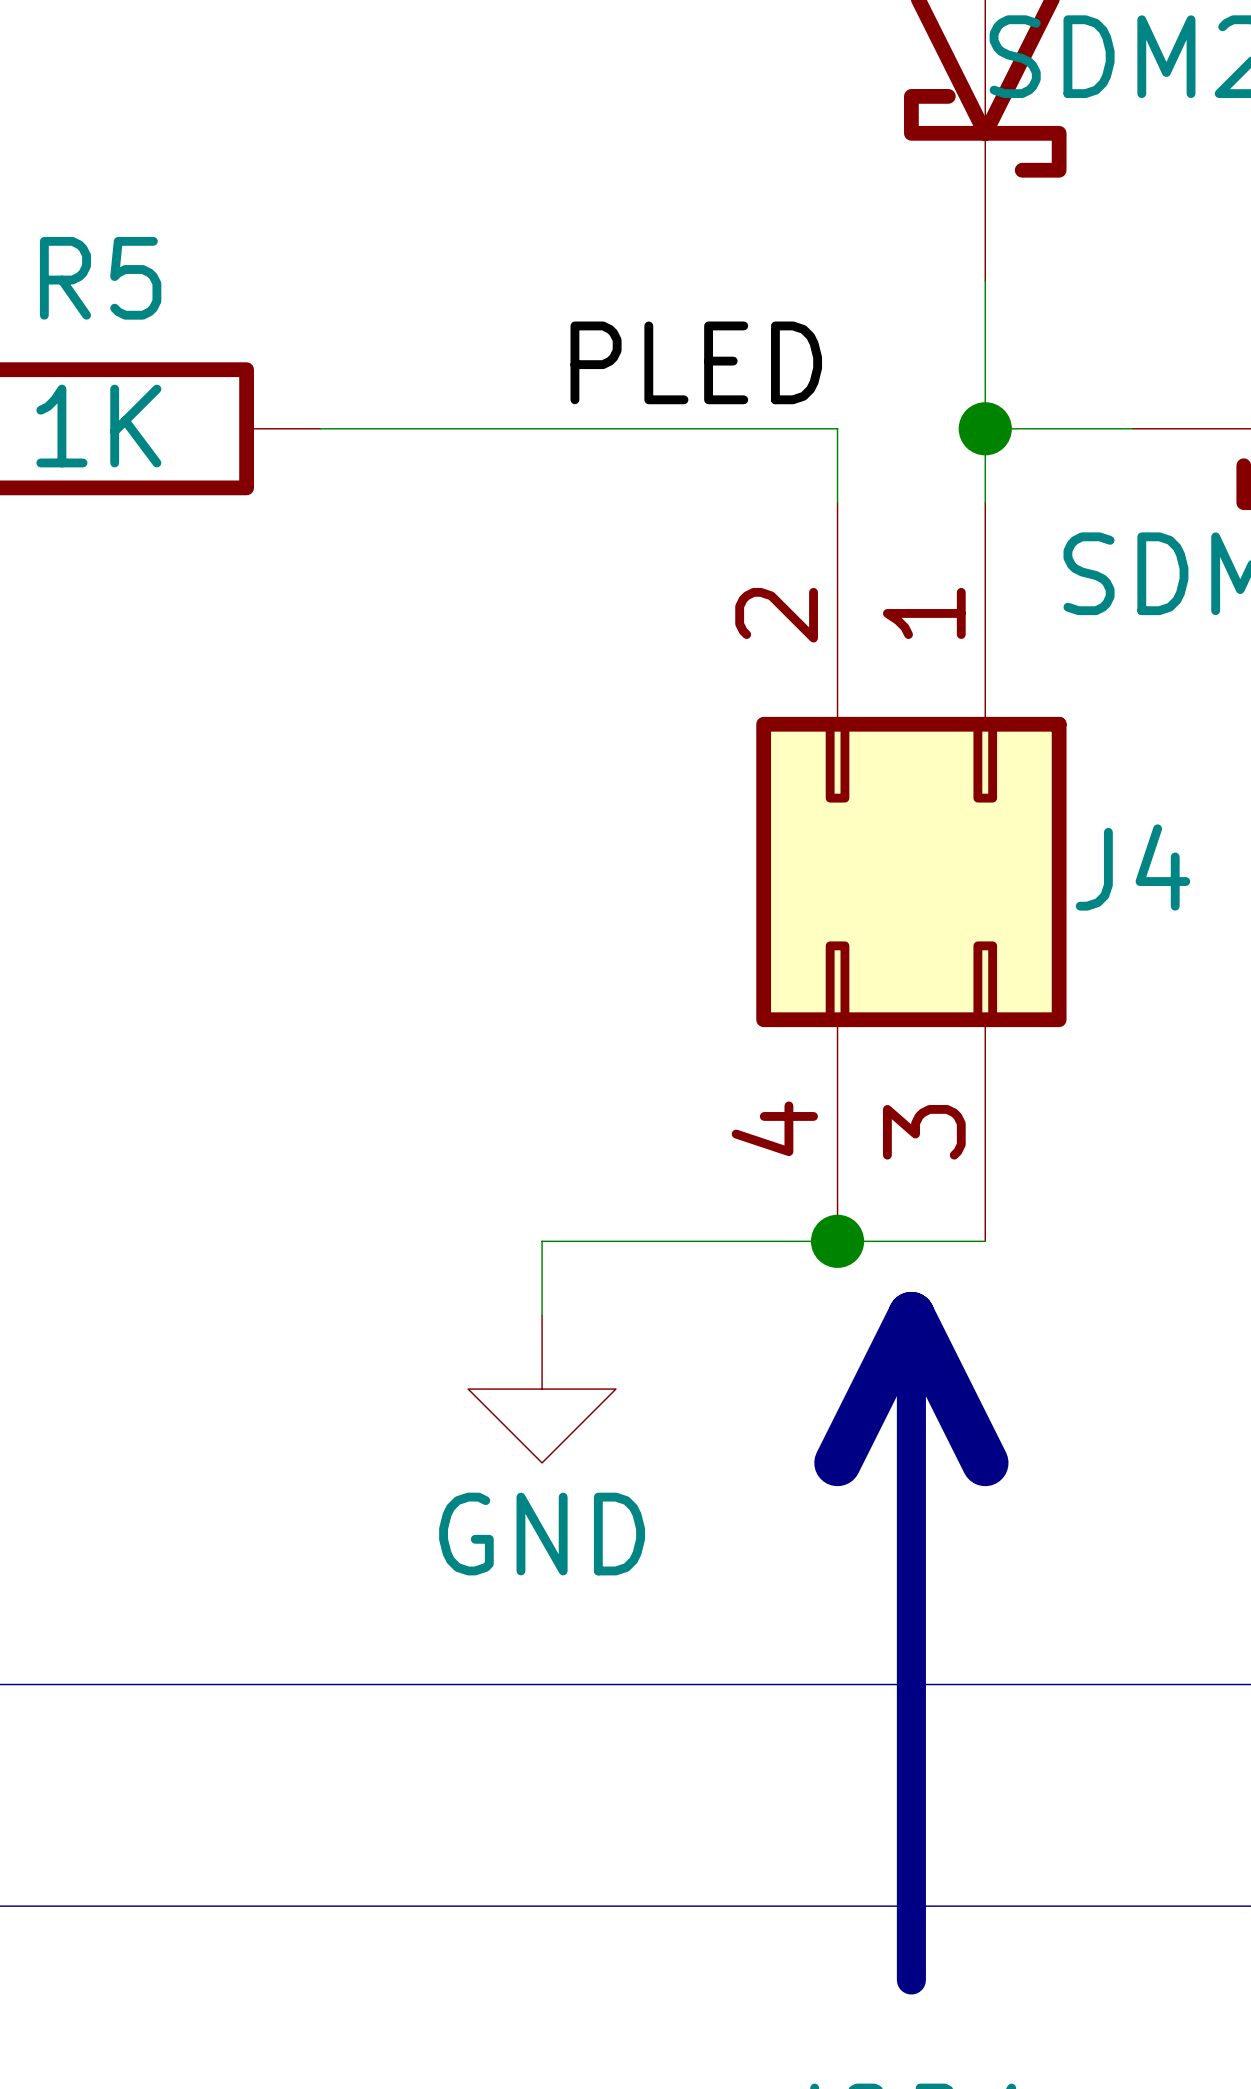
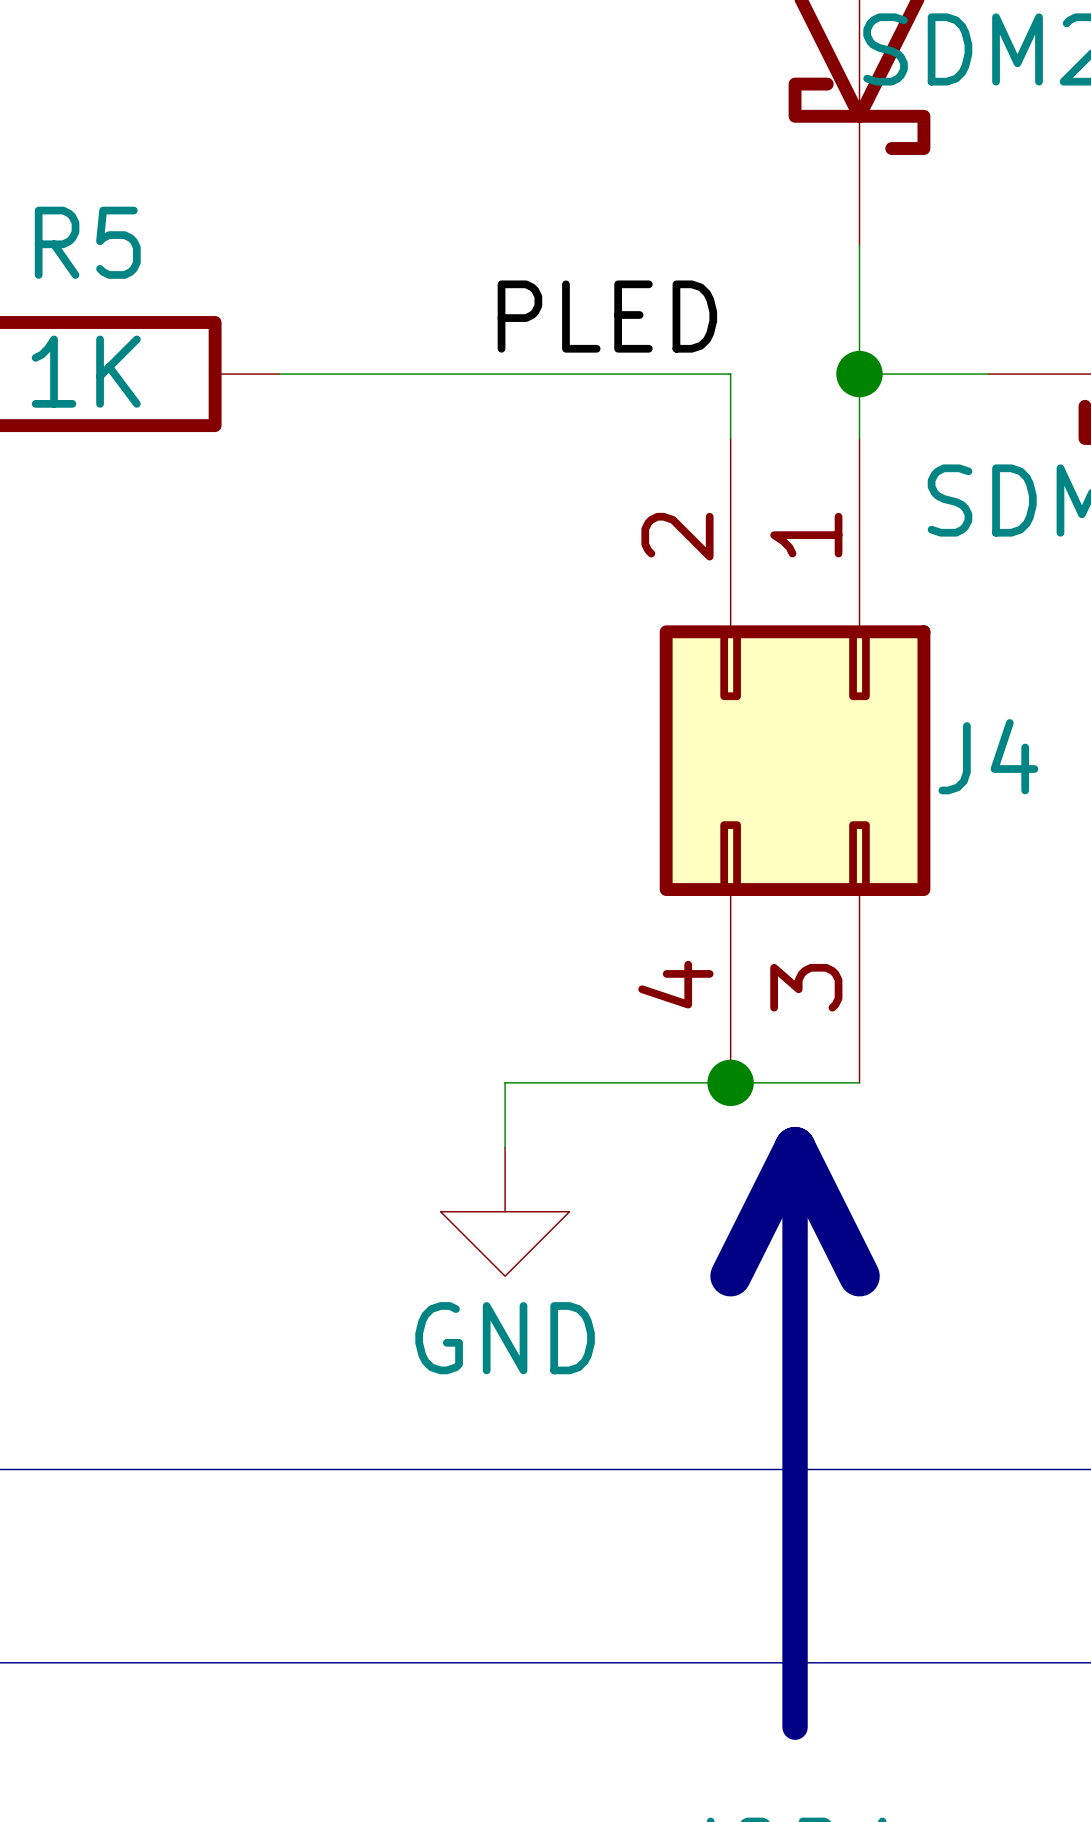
wire: (579, 1241) (542, 1241) (542, 1315) -> (505, 1082) (505, 1147)
power symbol position: GND (542, 1389) -> GND (505, 1211)

